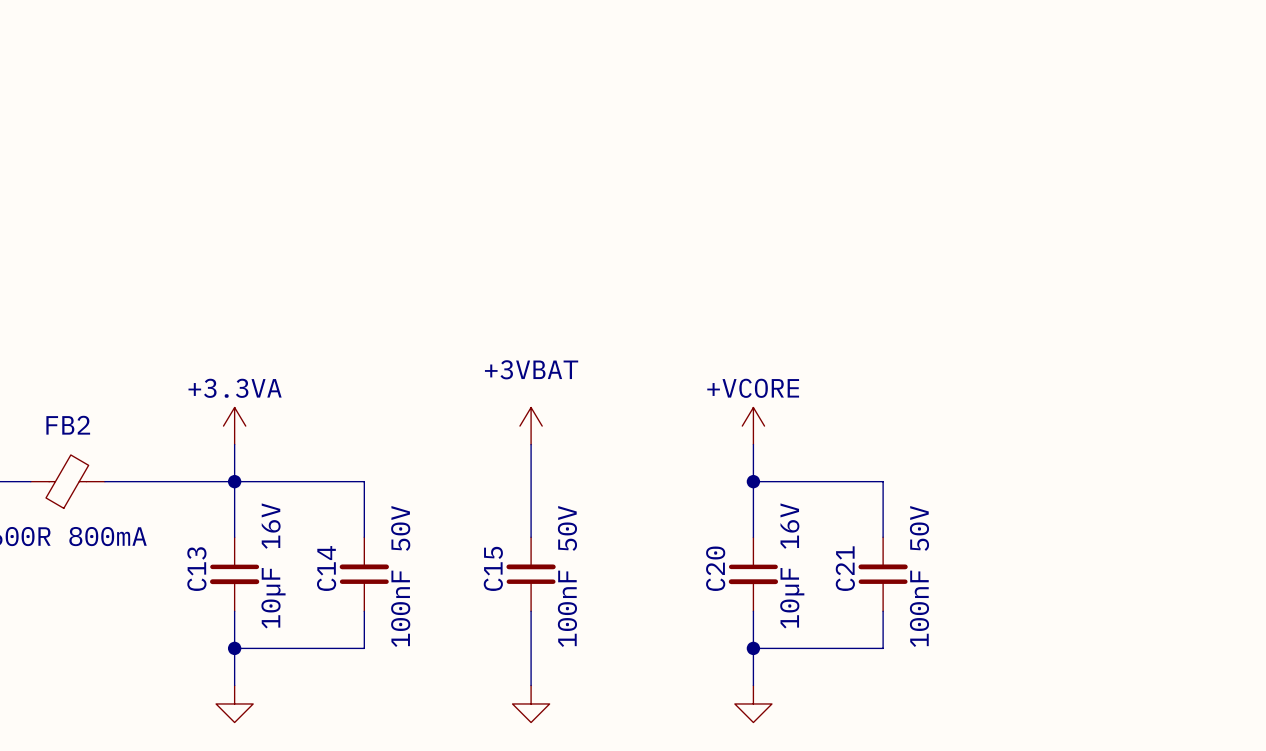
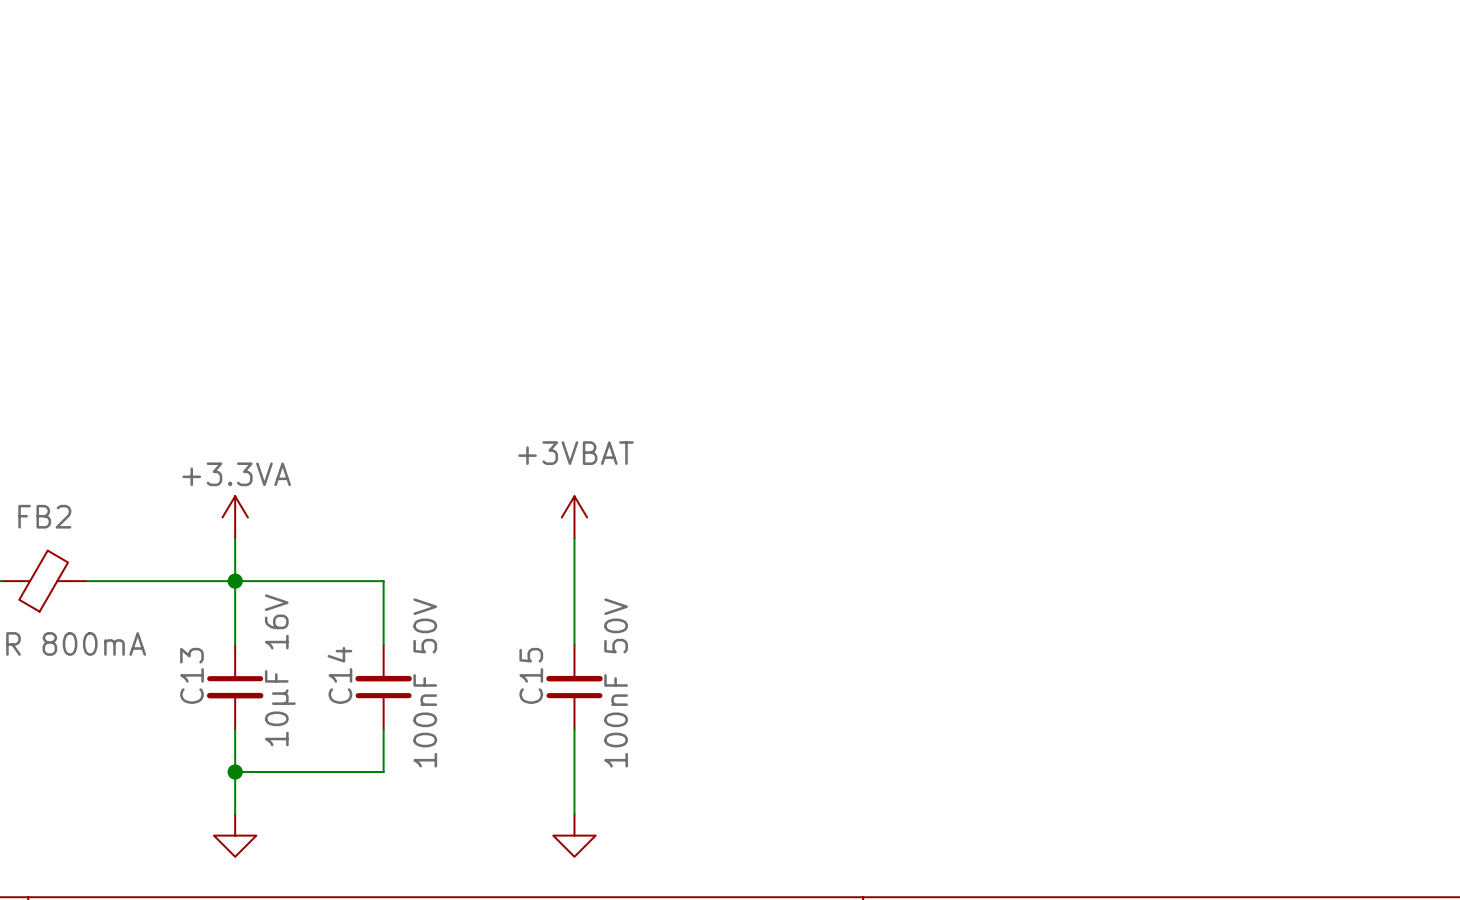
power symbol: +VCORE (753, 426) -> none
wire: (753, 444) (753, 537) -> none
wire: (753, 481) (883, 481) (883, 537) -> none
junction: (753, 481) -> none
C20: 10µF 16V (753, 574) -> none
C21: 100nF 50V (883, 574) -> none
wire: (753, 611) (753, 685) -> none
wire: (883, 611) (883, 648) (753, 648) -> none
junction: (753, 648) -> none
power symbol: (753, 703) -> none

